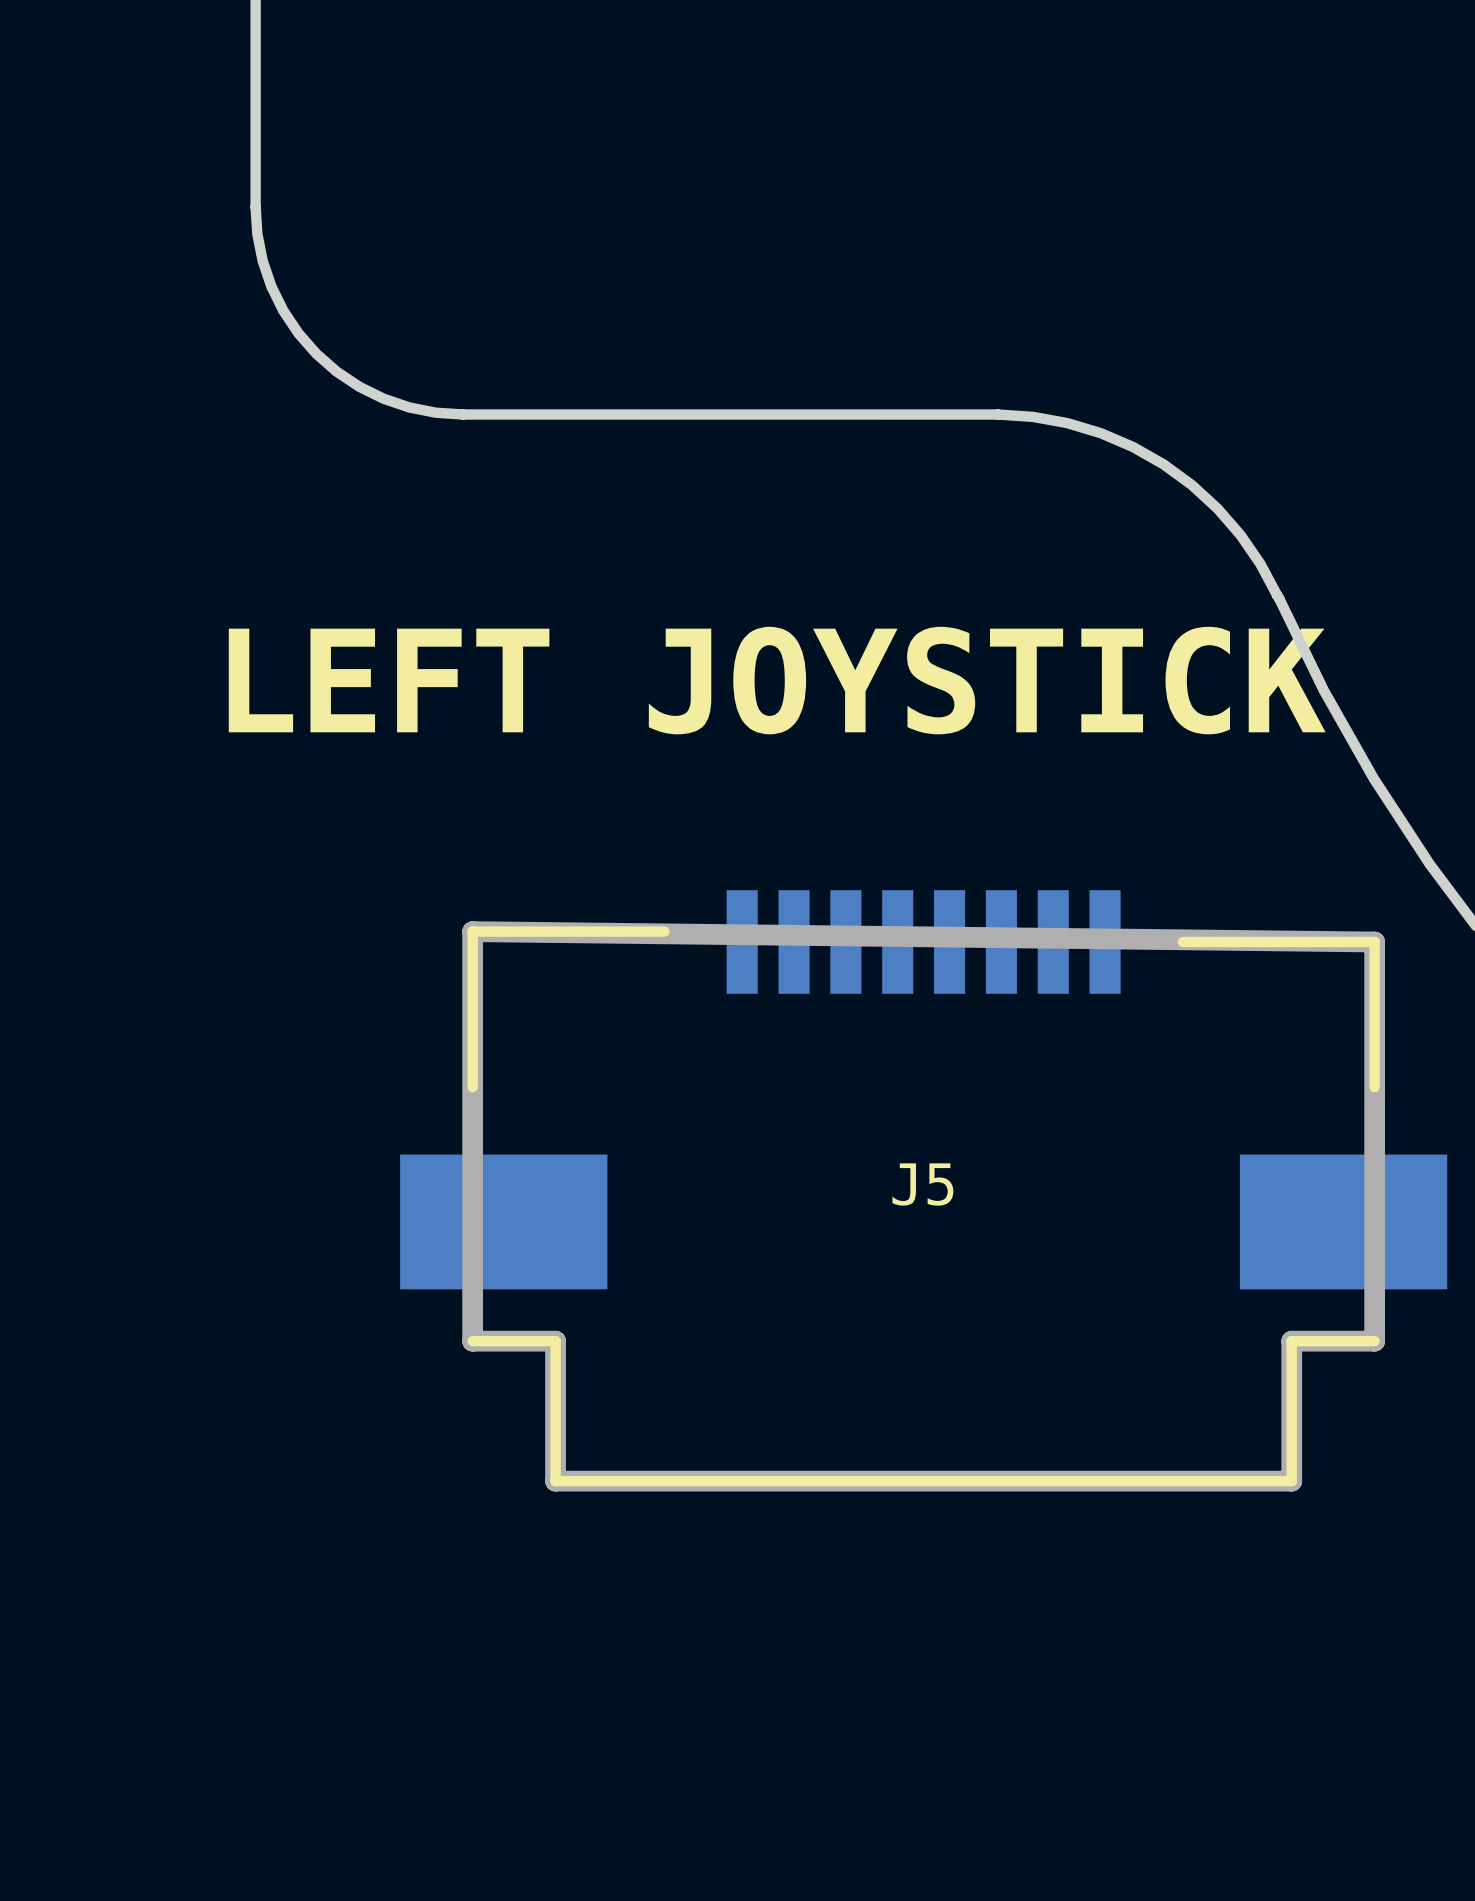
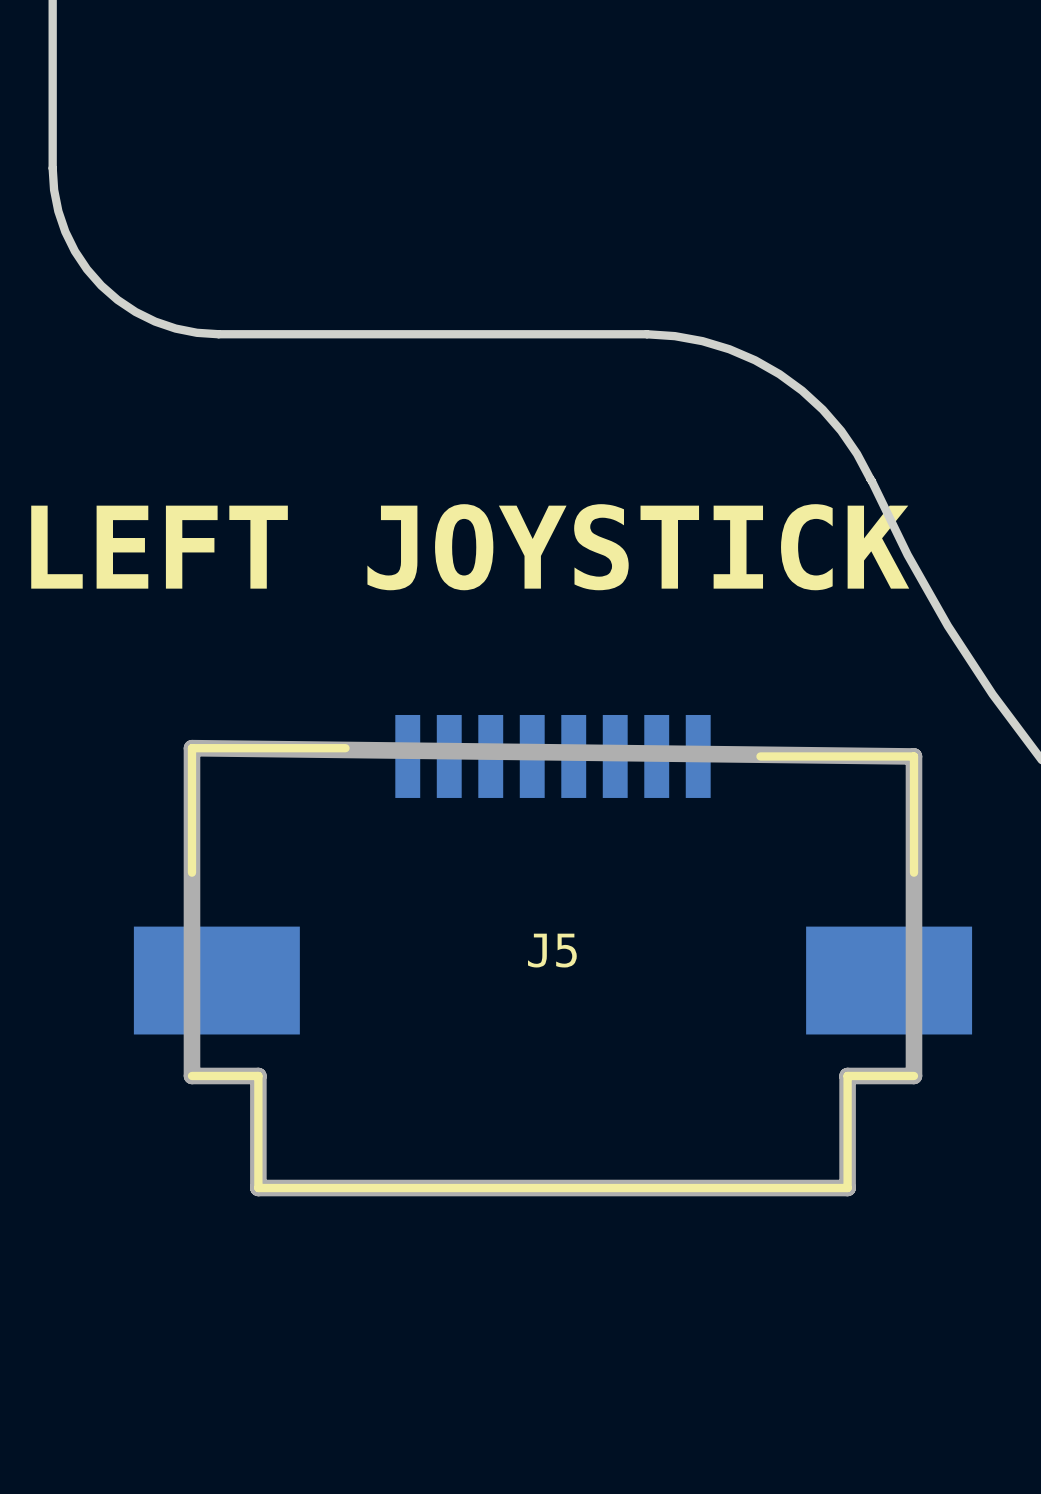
J5 position: (923, 1190) -> (552, 955)

